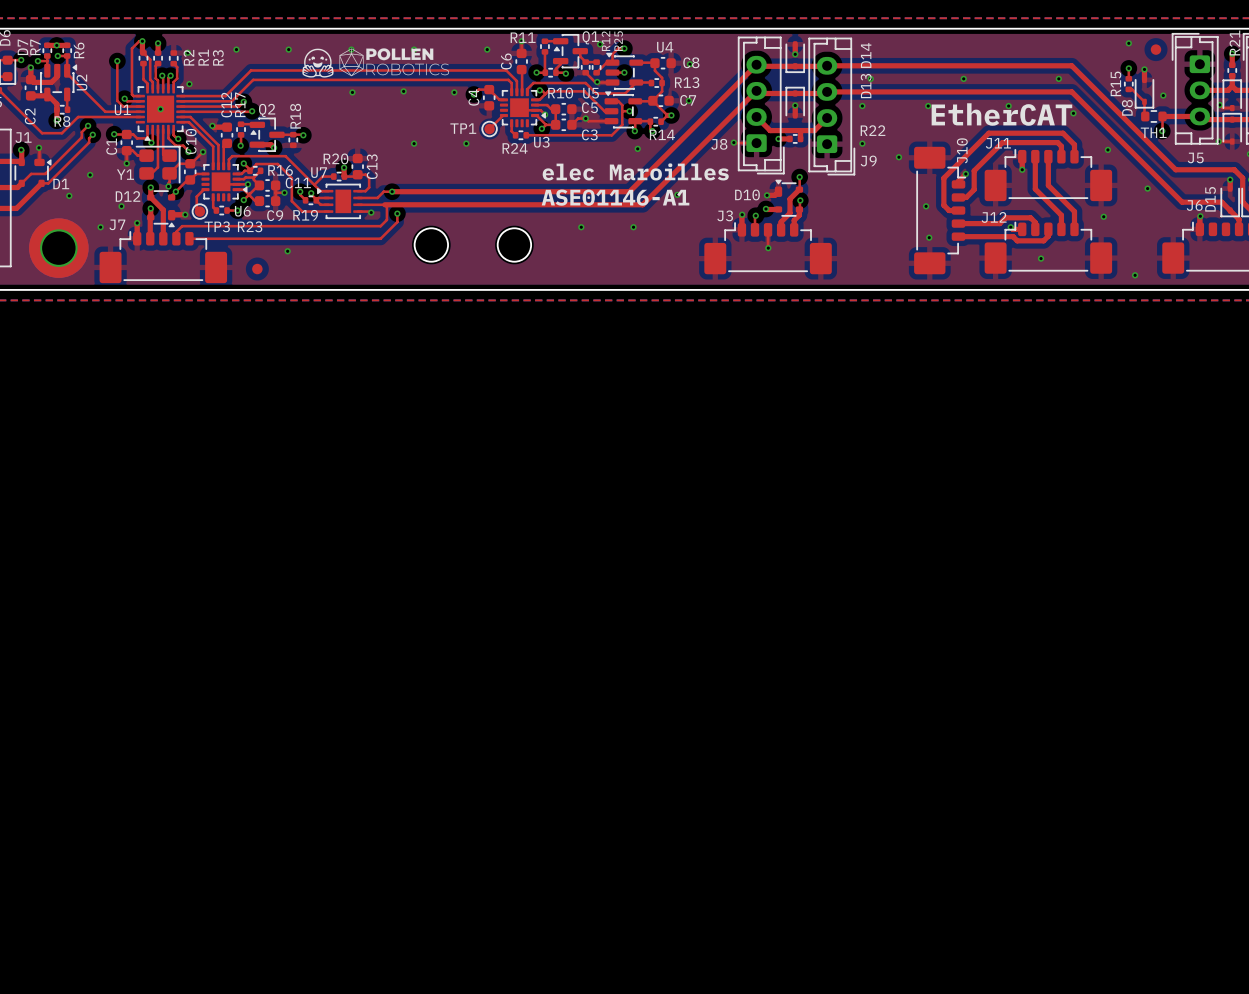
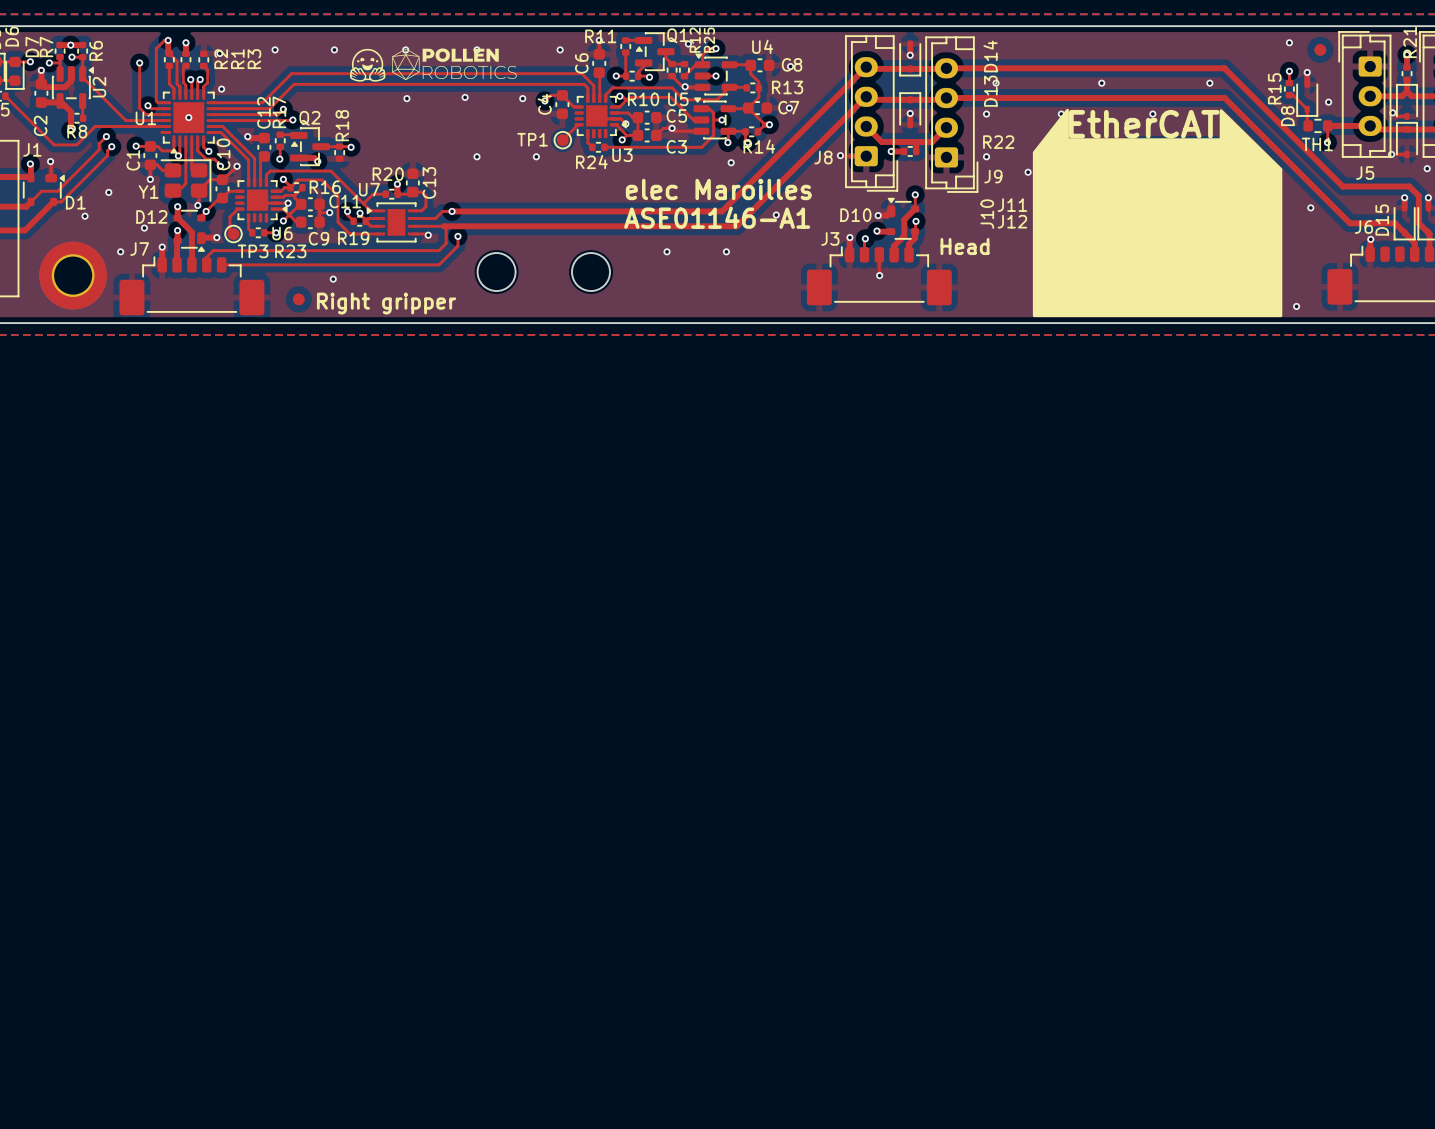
drawing: none -> [1032, 108, 1283, 318]
J11 name position: J11 (998, 143) -> J11 (1012, 205)
J10 name position: J10 (962, 150) -> J10 (987, 214)
J12 name position: J12 (994, 217) -> J12 (1012, 221)
text: none -> Head (965, 246)
text: none -> Right gripper (386, 303)

